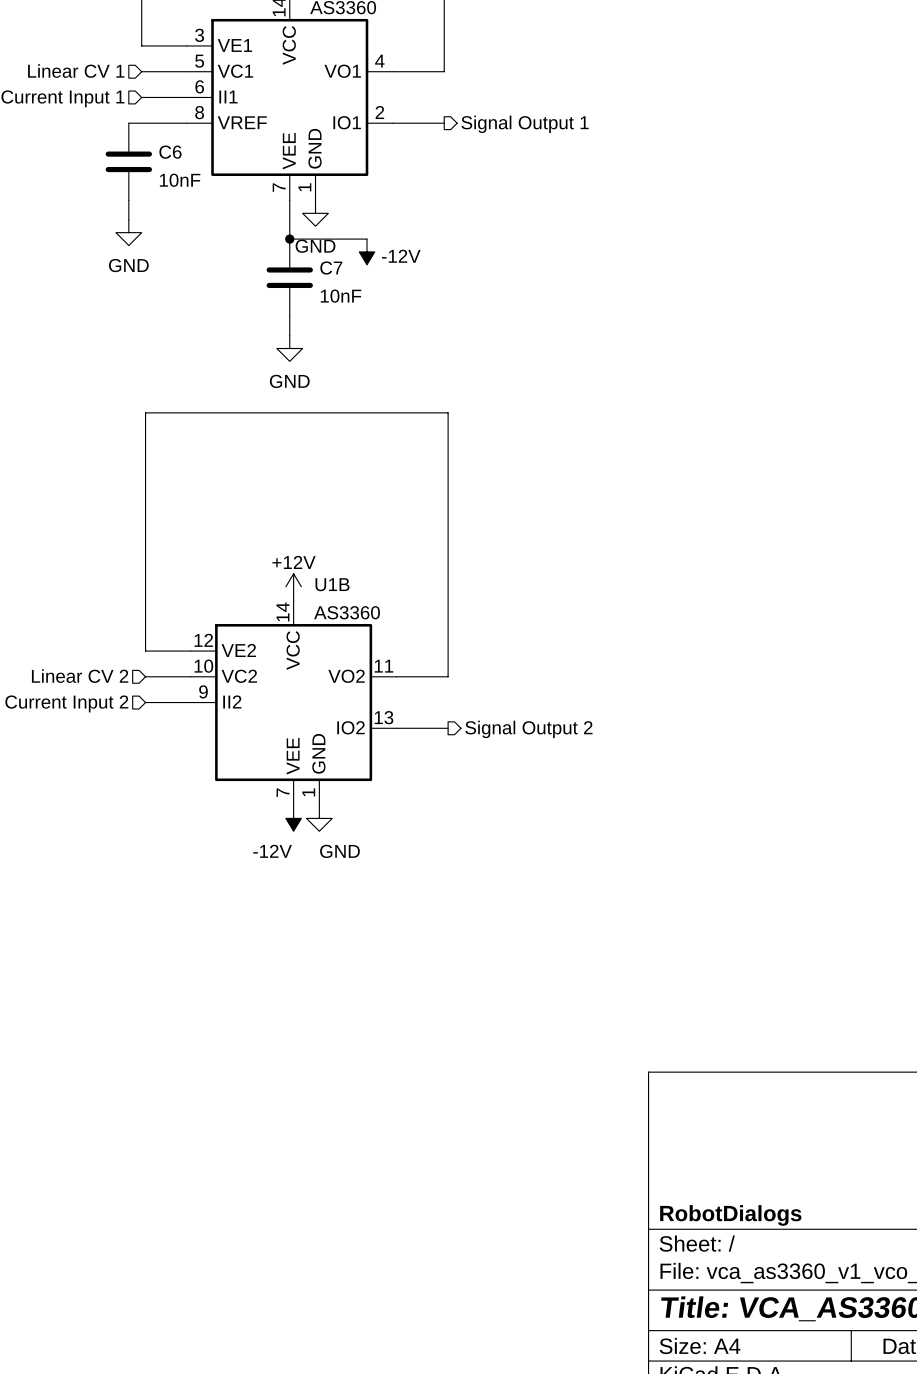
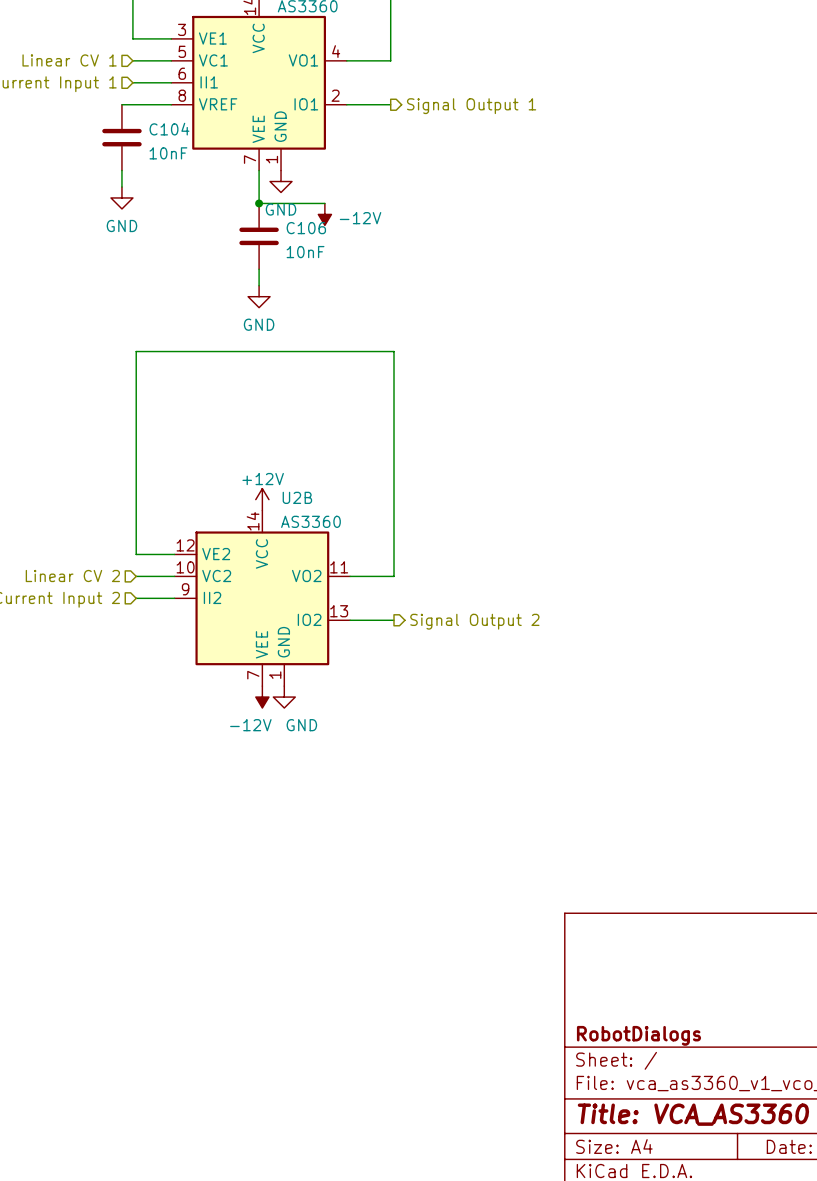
C6 name: C6 (170, 152) -> C104 (169, 129)
C7 name: C7 (331, 268) -> C106 (306, 228)
U1B name: U1B (332, 584) -> U2B (297, 497)

